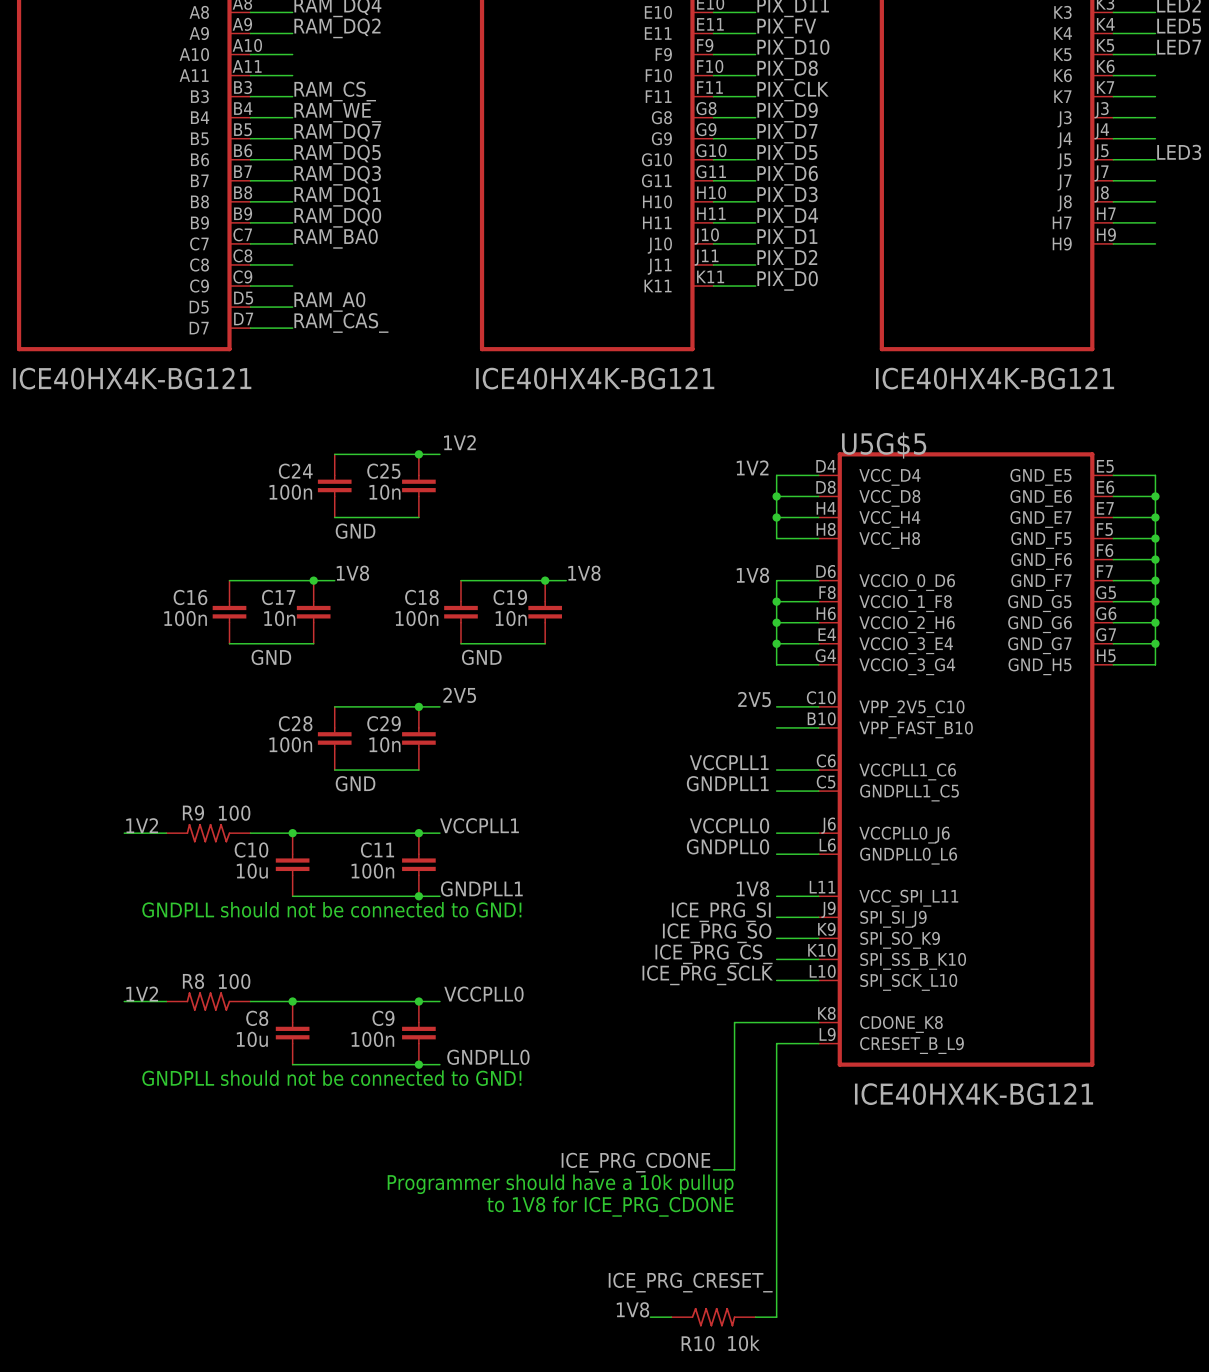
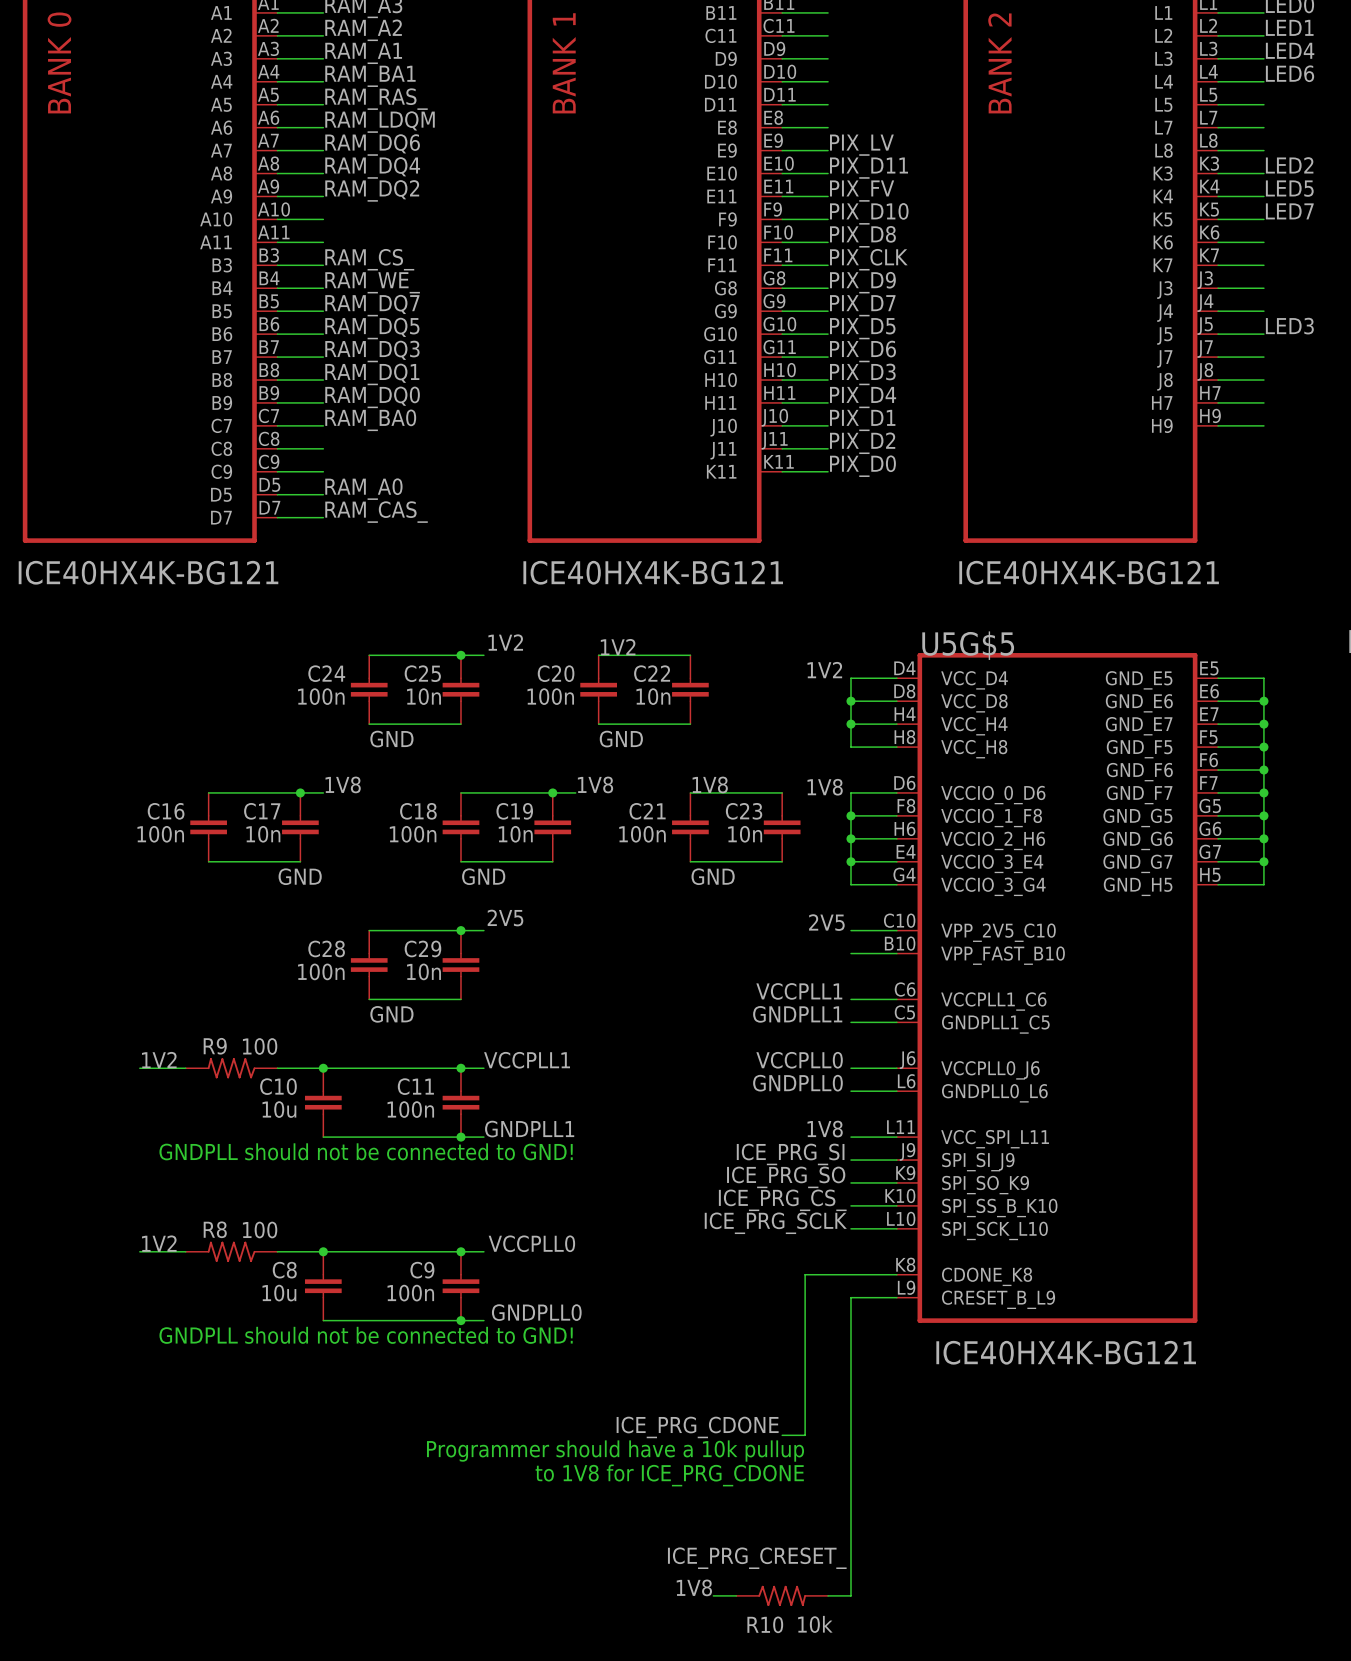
label: none -> 1V2 (618, 647)
wire: none -> (598, 655) (690, 655)
C20: none -> 100n (598, 689)
C22: none -> 10n (690, 689)
wire: none -> (598, 724) (690, 724)
label: none -> GND (621, 739)
label position: 1V8 (352, 573) -> 1V8 (343, 784)
label position: 1V8 (584, 573) -> 1V8 (595, 784)
label: none -> 1V8 (710, 784)
wire: (292, 580) (334, 580) -> (208, 792) (254, 792)
junction position: (313, 580) -> (300, 792)
wire: (524, 580) (566, 580) -> (460, 792) (506, 792)
junction position: (545, 580) -> (552, 792)
wire: none -> (690, 792) (782, 792)
C16 position: (229, 612) -> (208, 827)
C17 position: (313, 612) -> (300, 827)
C18 position: (460, 612) -> (460, 827)
C19 position: (545, 612) -> (552, 827)
C21: none -> 100n (690, 827)
C23: none -> 10n (782, 827)
wire: (271, 643) (313, 643) -> (208, 861) (254, 861)
wire: (503, 643) (545, 643) -> (460, 861) (506, 861)
wire: none -> (690, 861) (782, 861)
label position: GND (481, 657) -> GND (483, 876)
label: none -> GND (713, 876)

